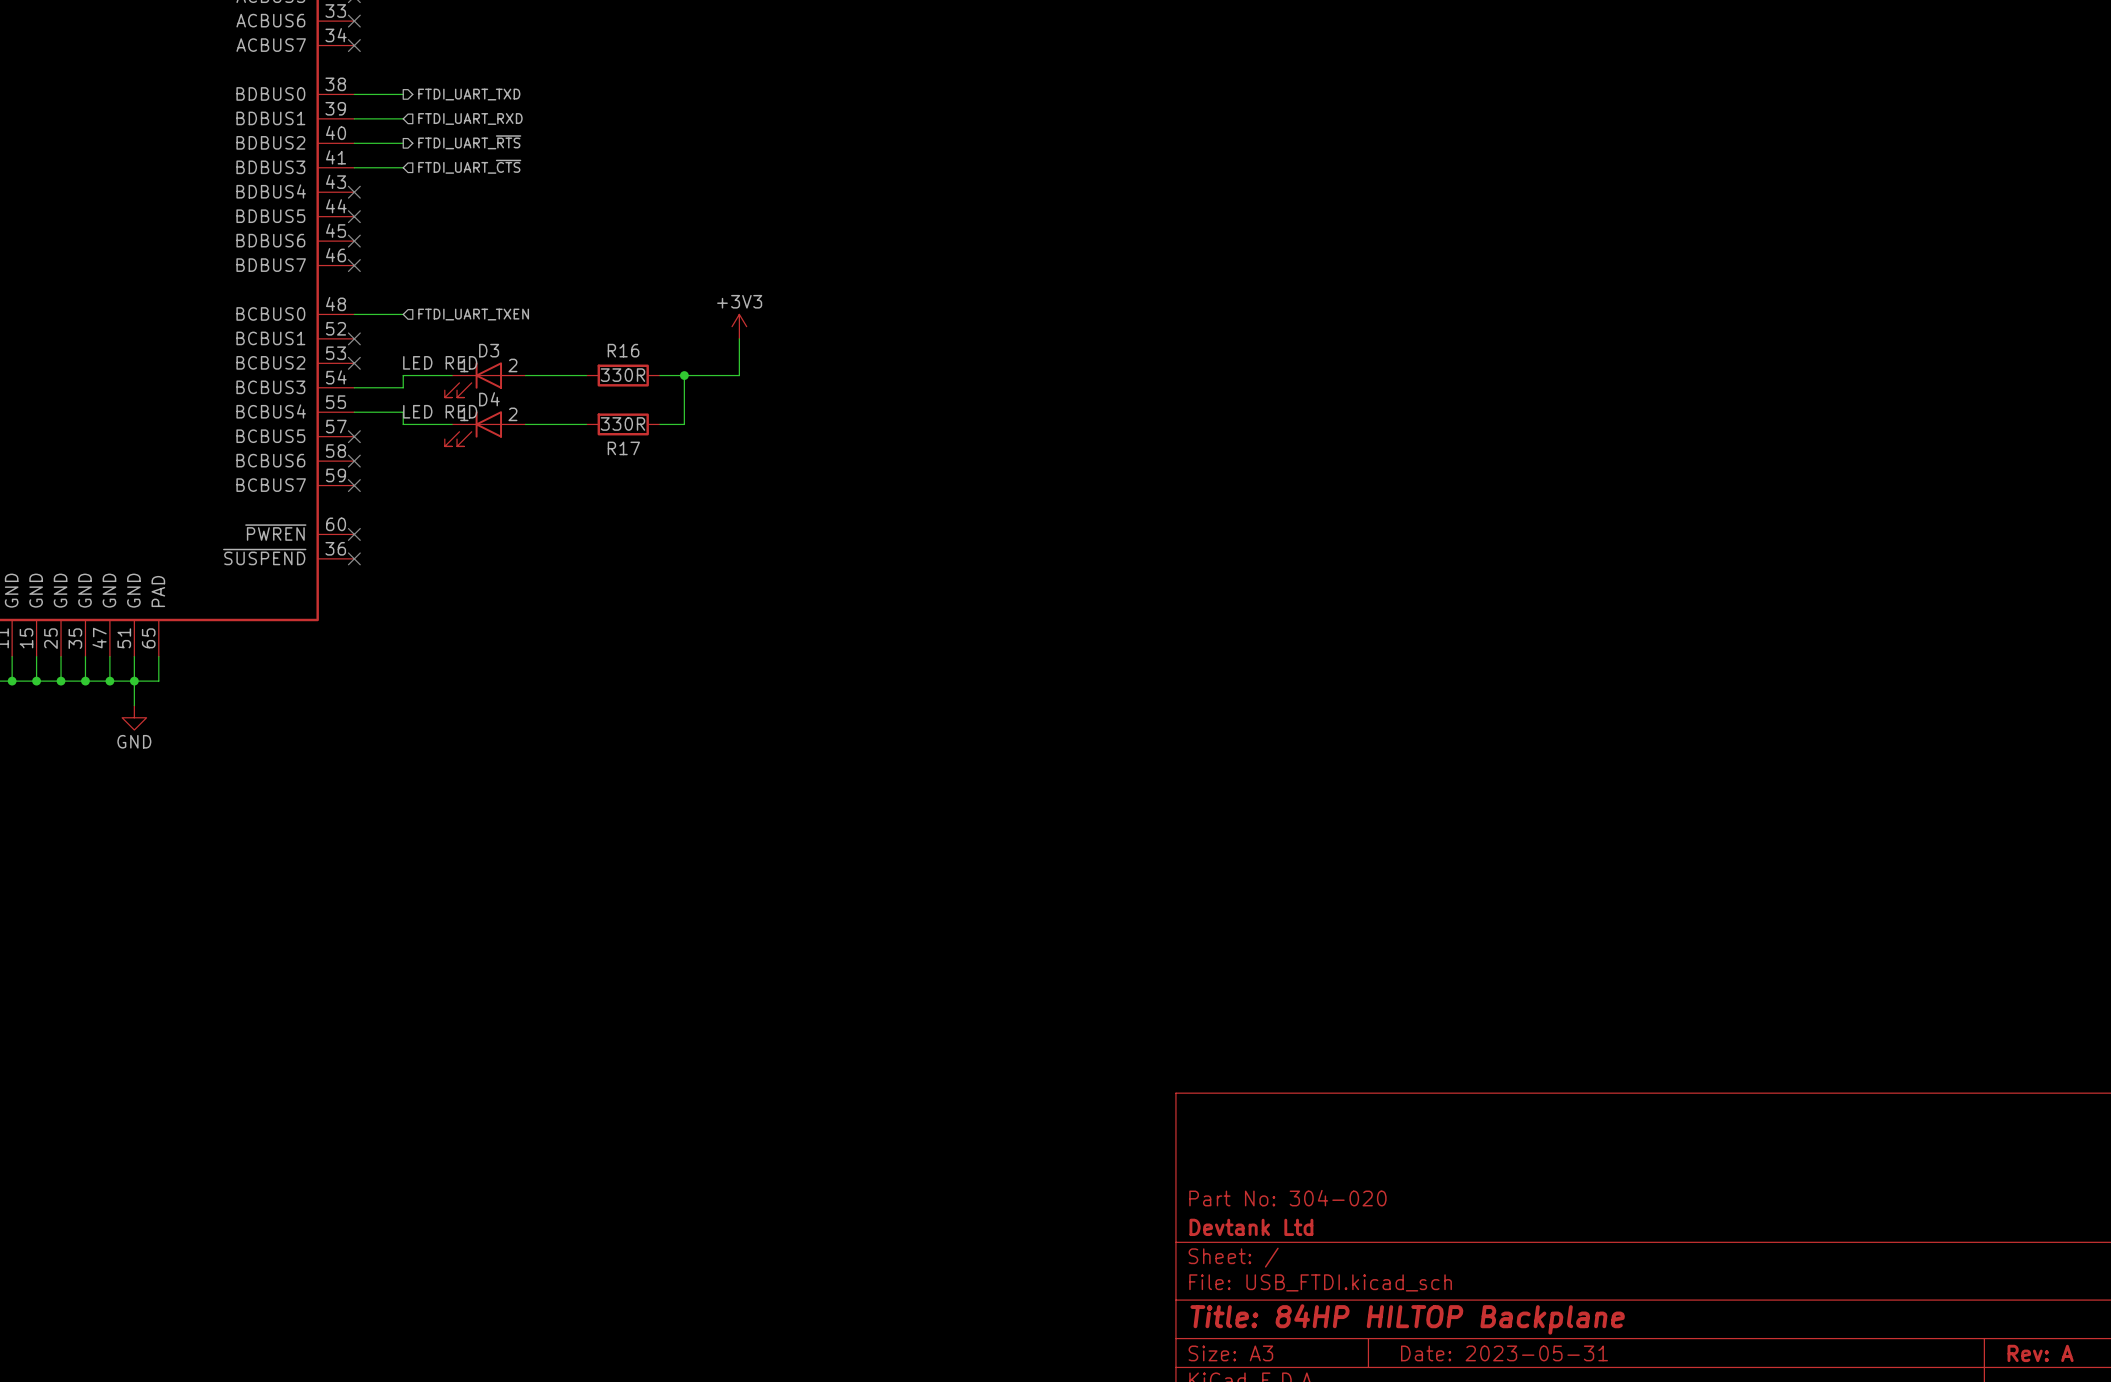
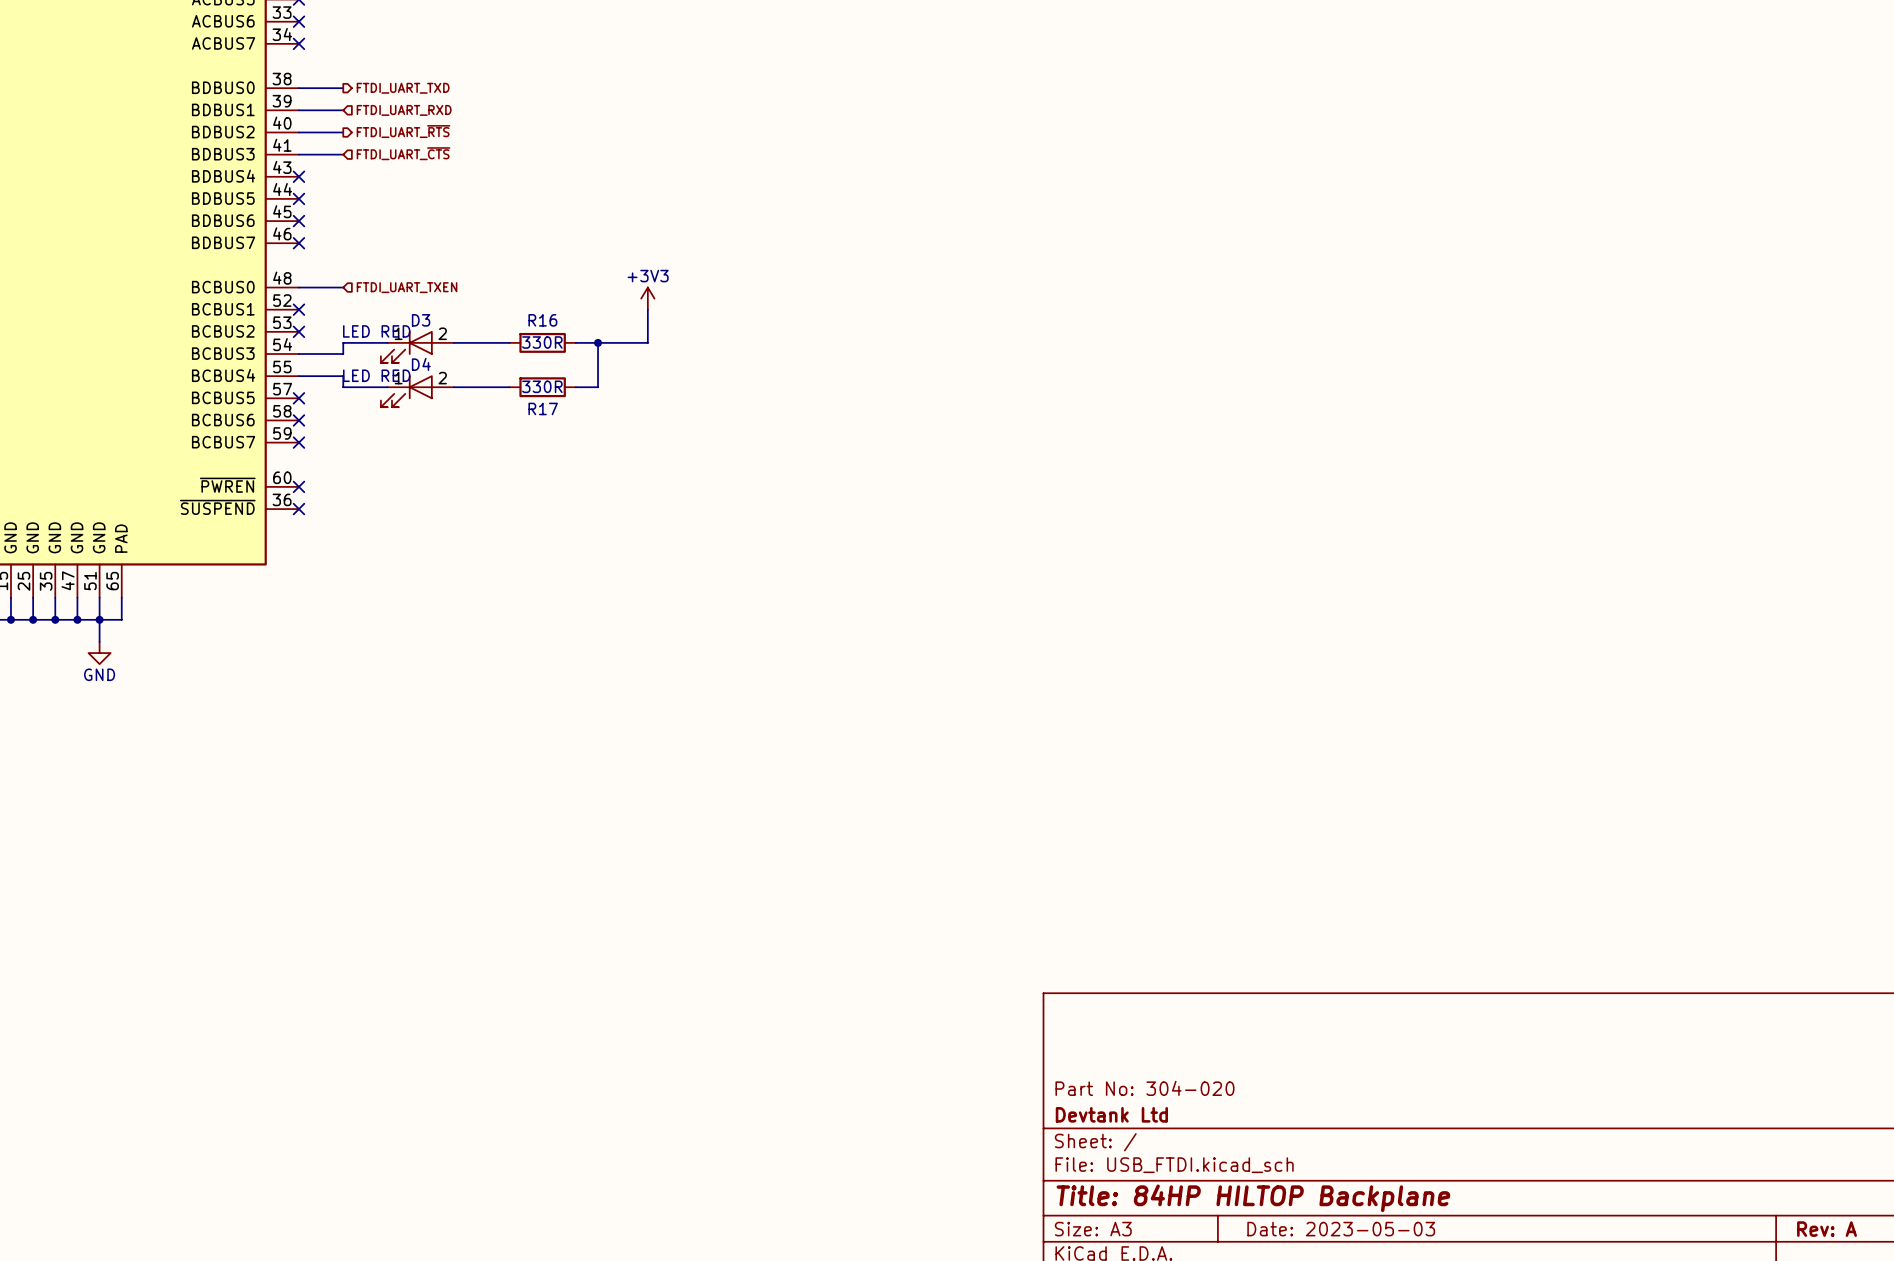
title block: Date: 2023-05-31 (1504, 1353) -> Date: 2023-05-03 (1341, 1229)

